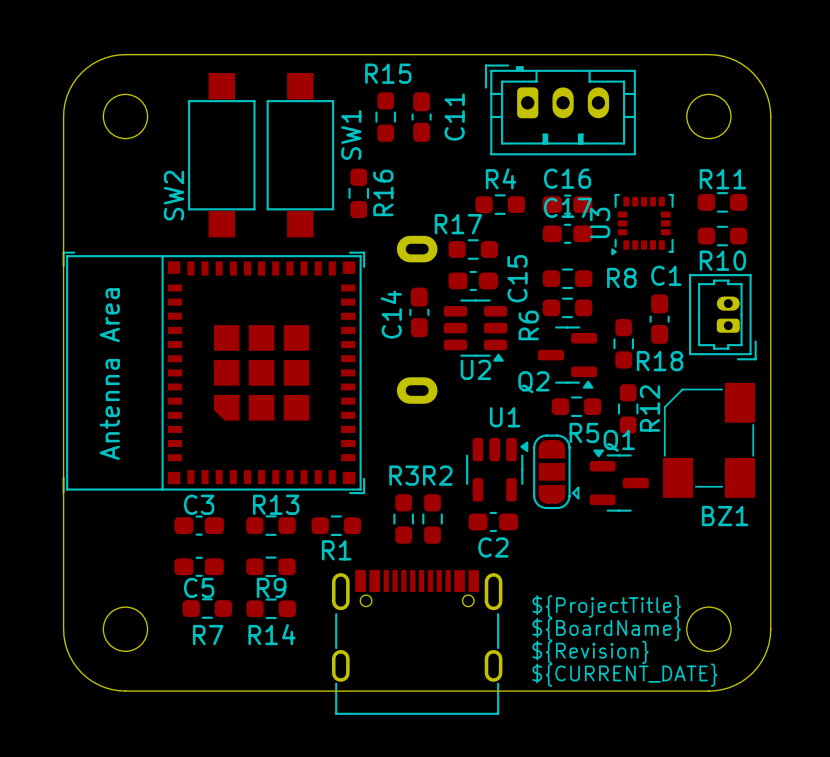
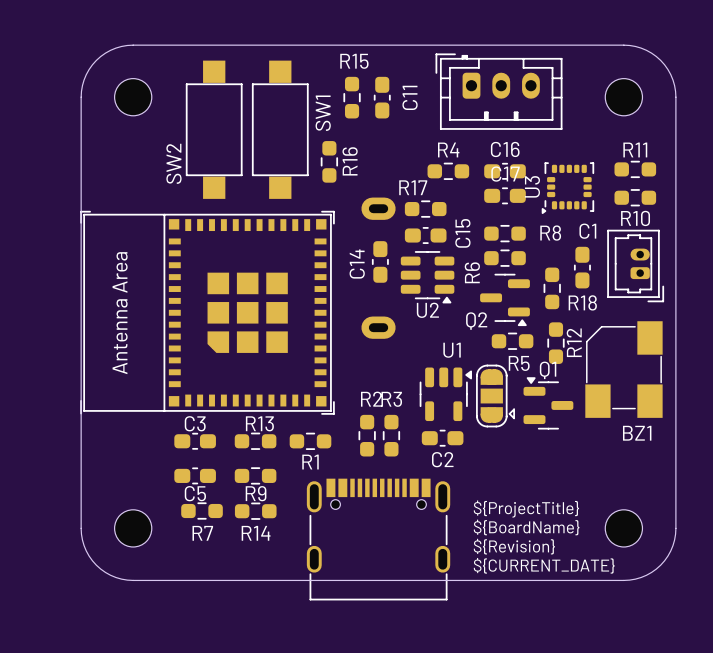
R3 name: R3 (404, 475) -> R2 (371, 399)
R2 name: R2 (437, 475) -> R3 (391, 399)

